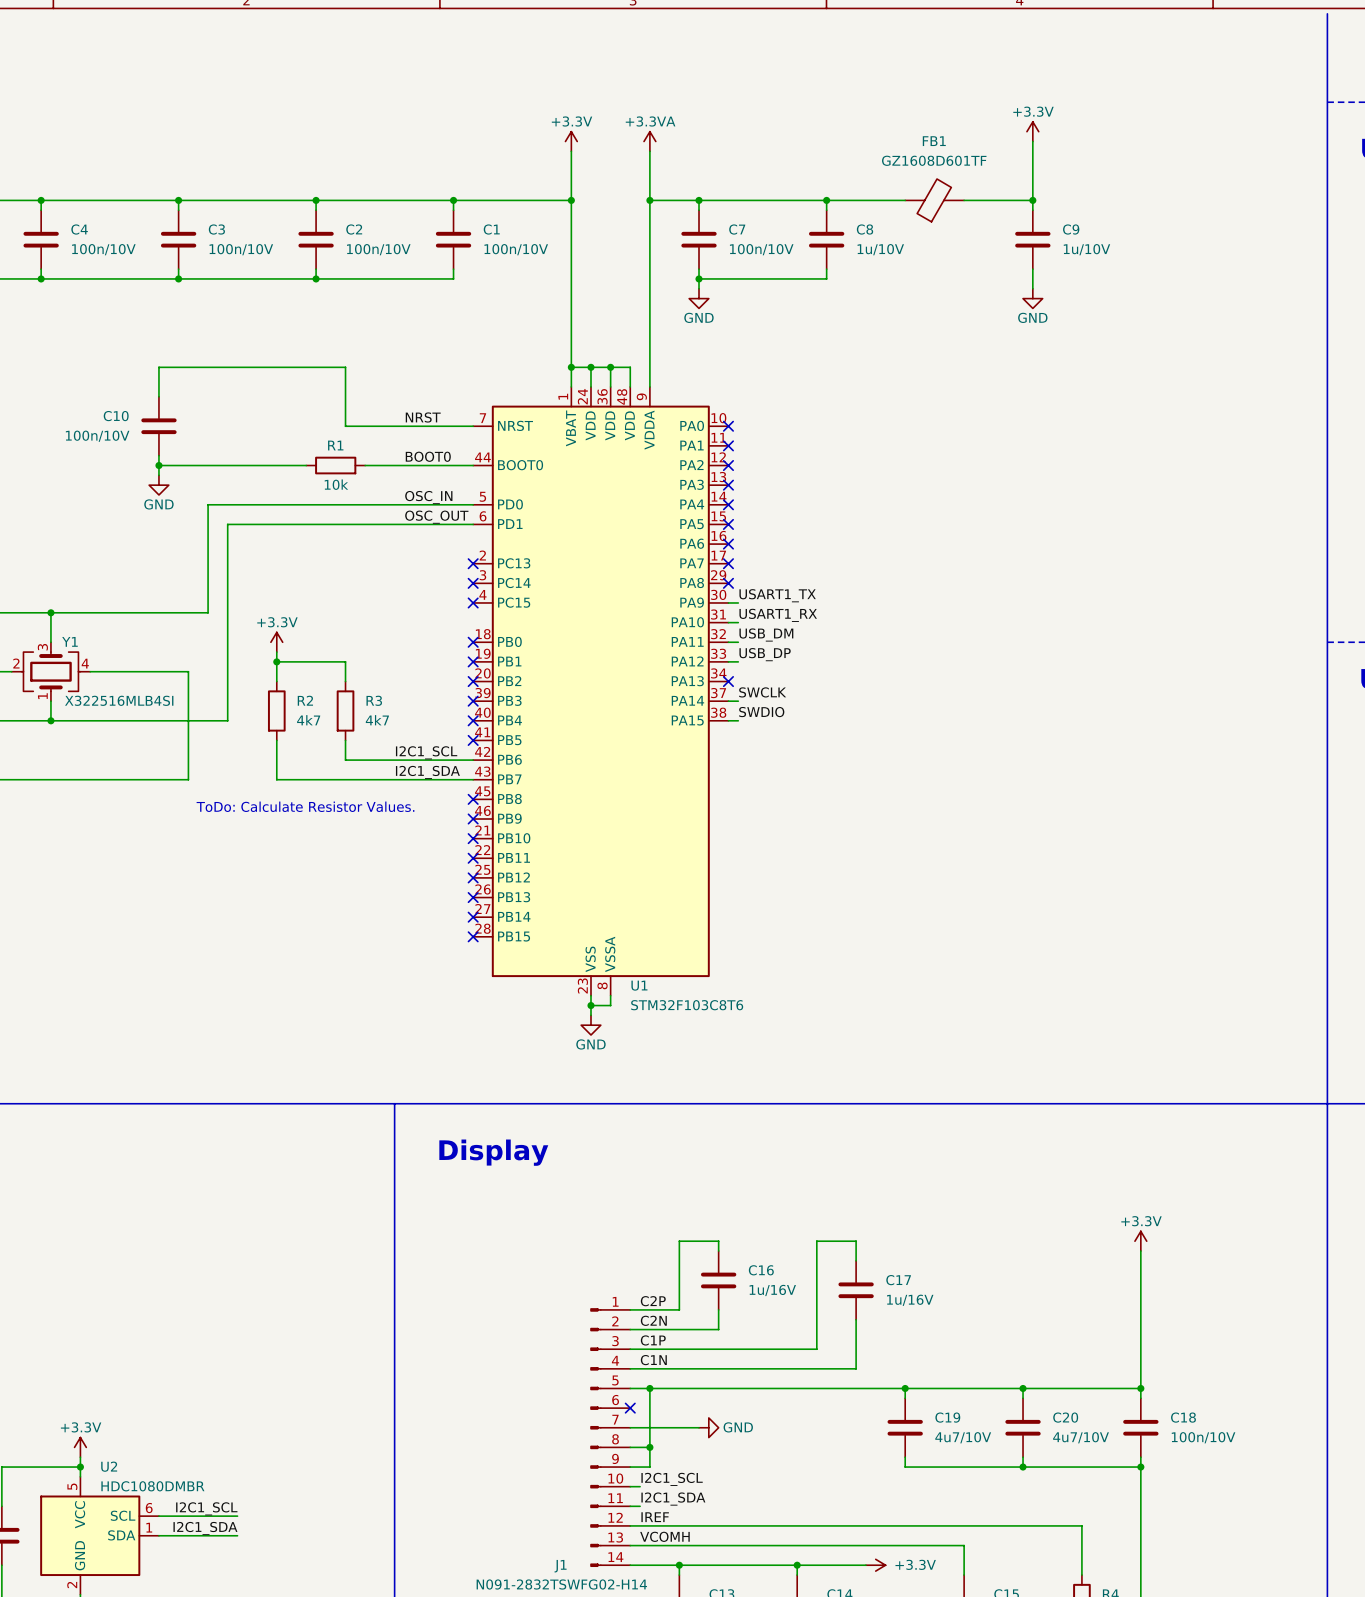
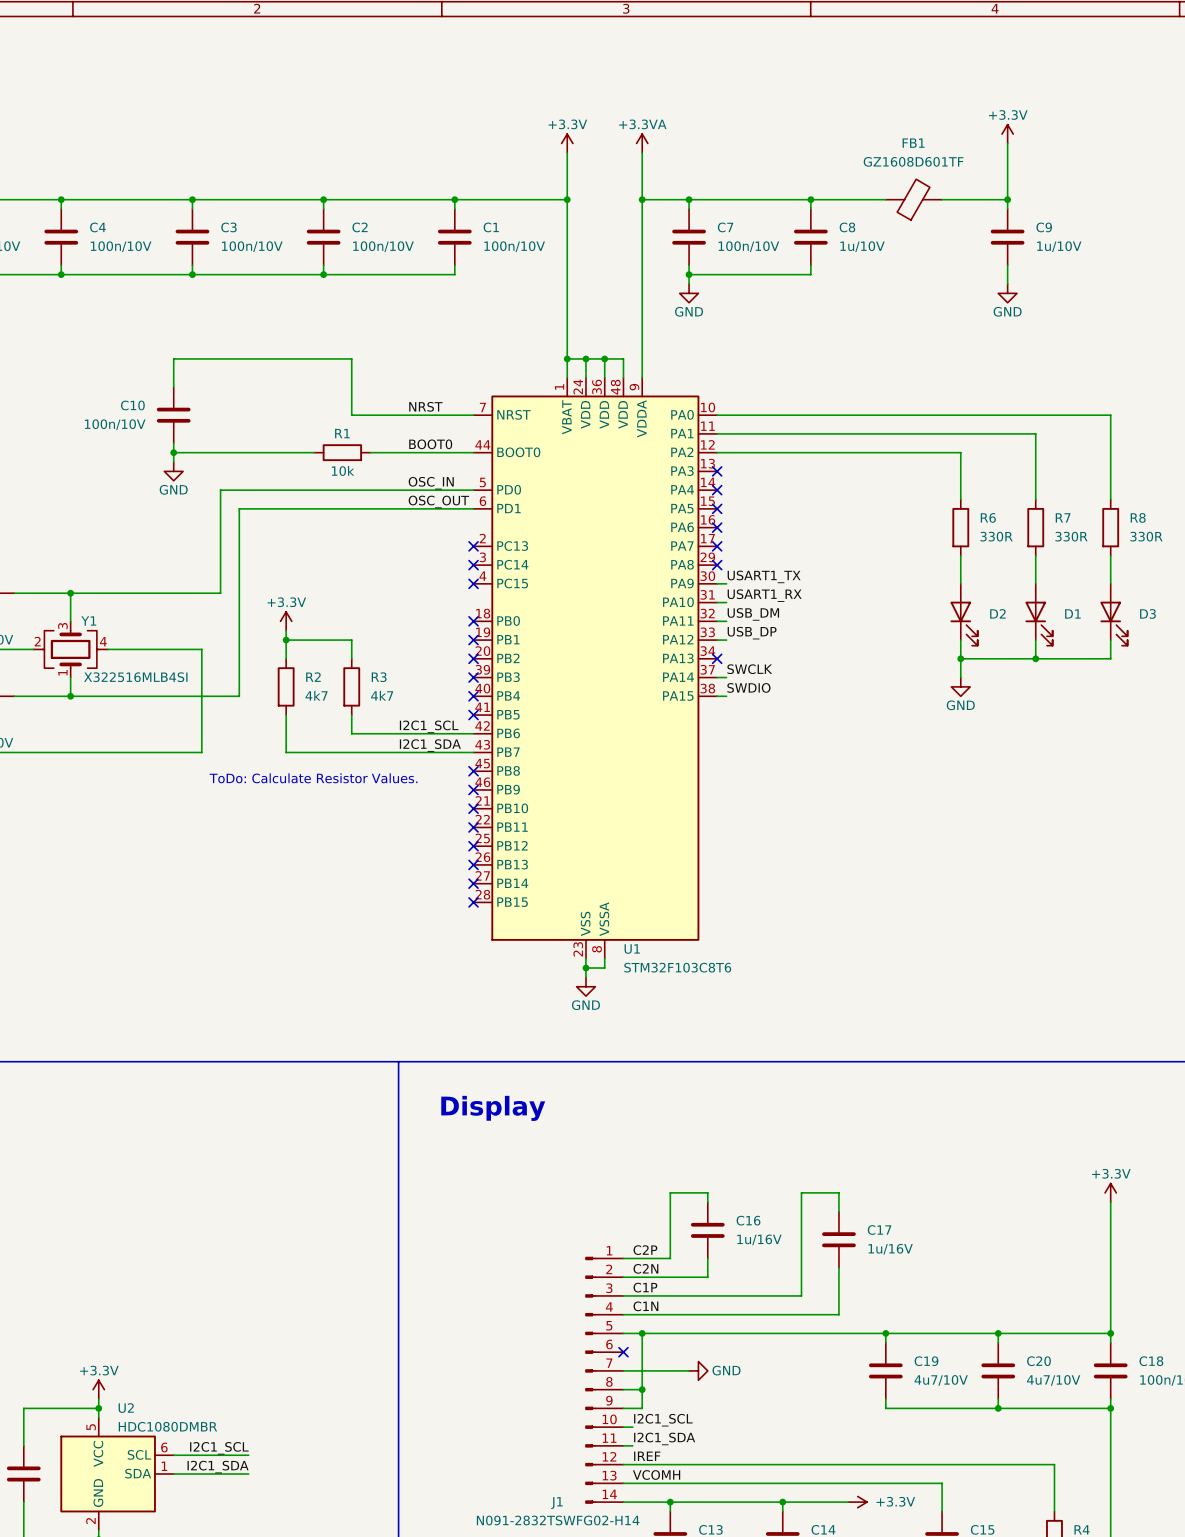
wire: none -> (717, 415) (1110, 415) (1110, 499)
no-connect mark: (728, 426) -> none
wire: none -> (717, 433) (1035, 433) (1035, 499)
no-connect mark: (728, 445) -> none
wire: none -> (717, 452) (960, 452) (960, 499)
no-connect mark: (728, 465) -> none
R6: none -> 330R (960, 527)
R7: none -> 330R (1035, 527)
R8: none -> 330R (1110, 527)
wire: none -> (960, 555) (960, 583)
wire: none -> (1035, 555) (1035, 583)
wire: none -> (1110, 555) (1110, 583)
D2: none -> (964, 614)
D1: none -> (1039, 614)
D3: none -> (1113, 614)
wire: none -> (960, 640) (960, 677)
wire: none -> (1035, 640) (1035, 658)
wire: none -> (1110, 640) (1110, 658) (960, 658)
junction: none -> (960, 658)
junction: none -> (1035, 658)
power symbol: none -> GND (960, 686)

